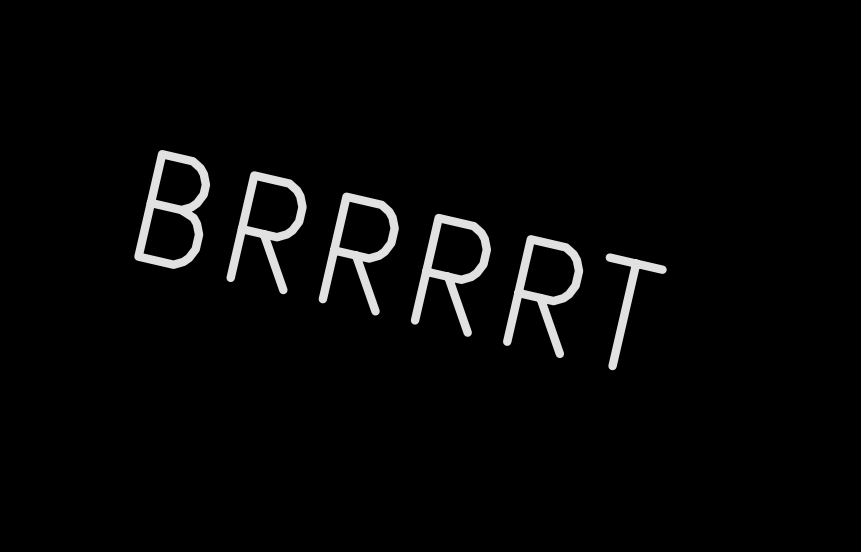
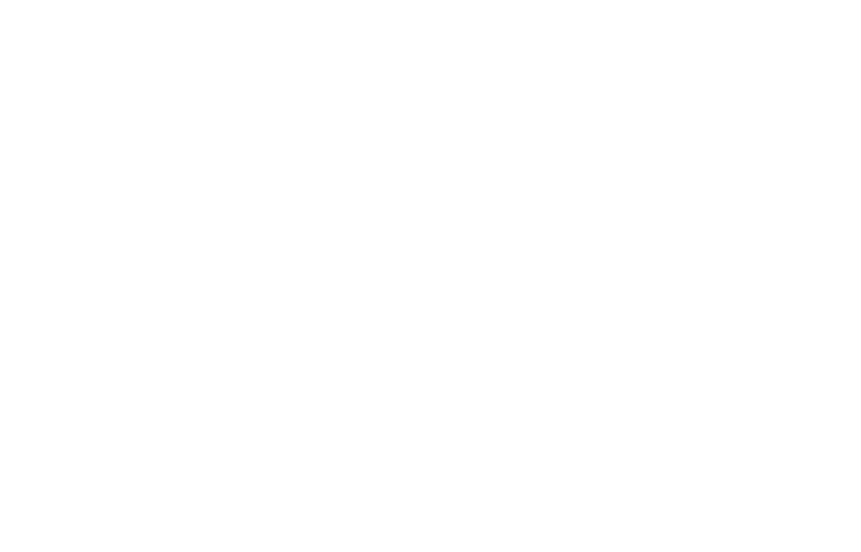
text: BRRRRT (400, 260) -> none

